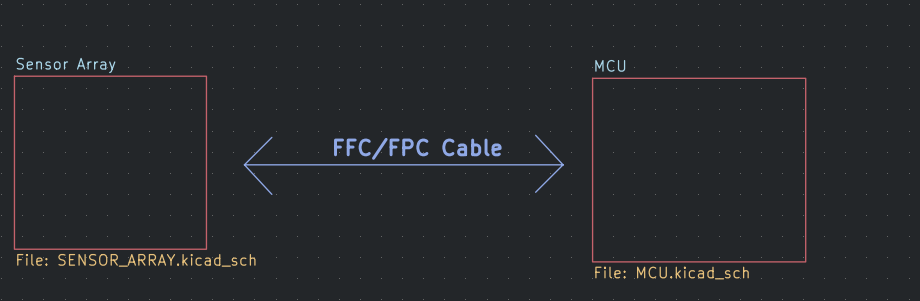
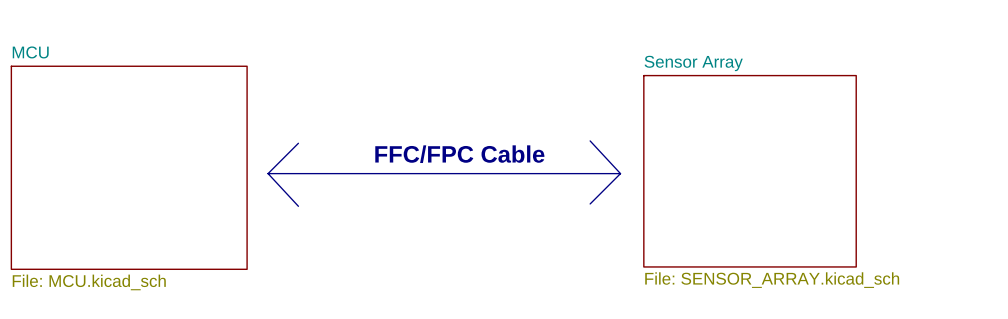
sheet MCU: none -> File: MCU.kicad_sch (129, 167)
sheet Sensor Array: File: SENSOR_ARRAY.kicad_sch (110, 162) -> none
sheet Sensor Array: none -> File: SENSOR_ARRAY.kicad_sch (750, 171)
sheet MCU: File: MCU.kicad_sch (699, 170) -> none

